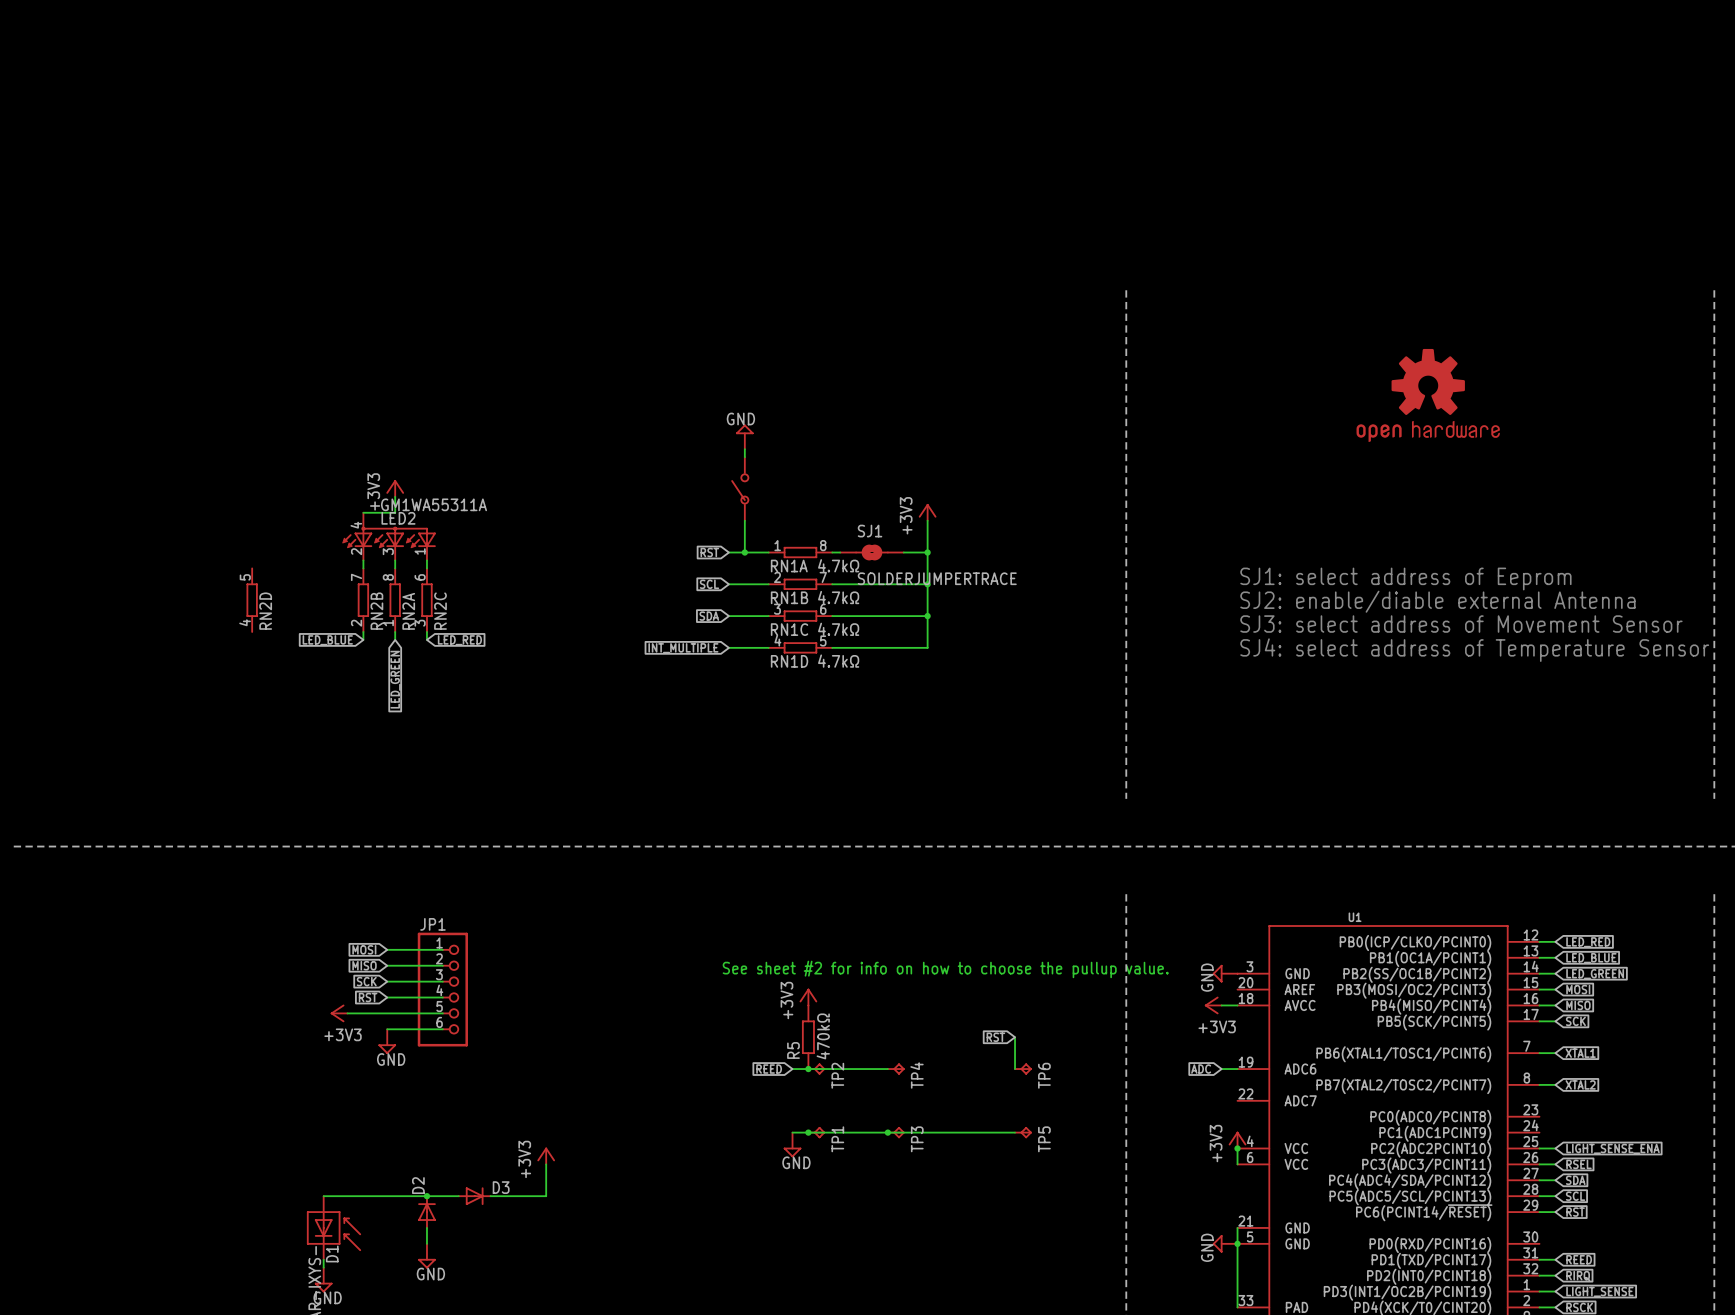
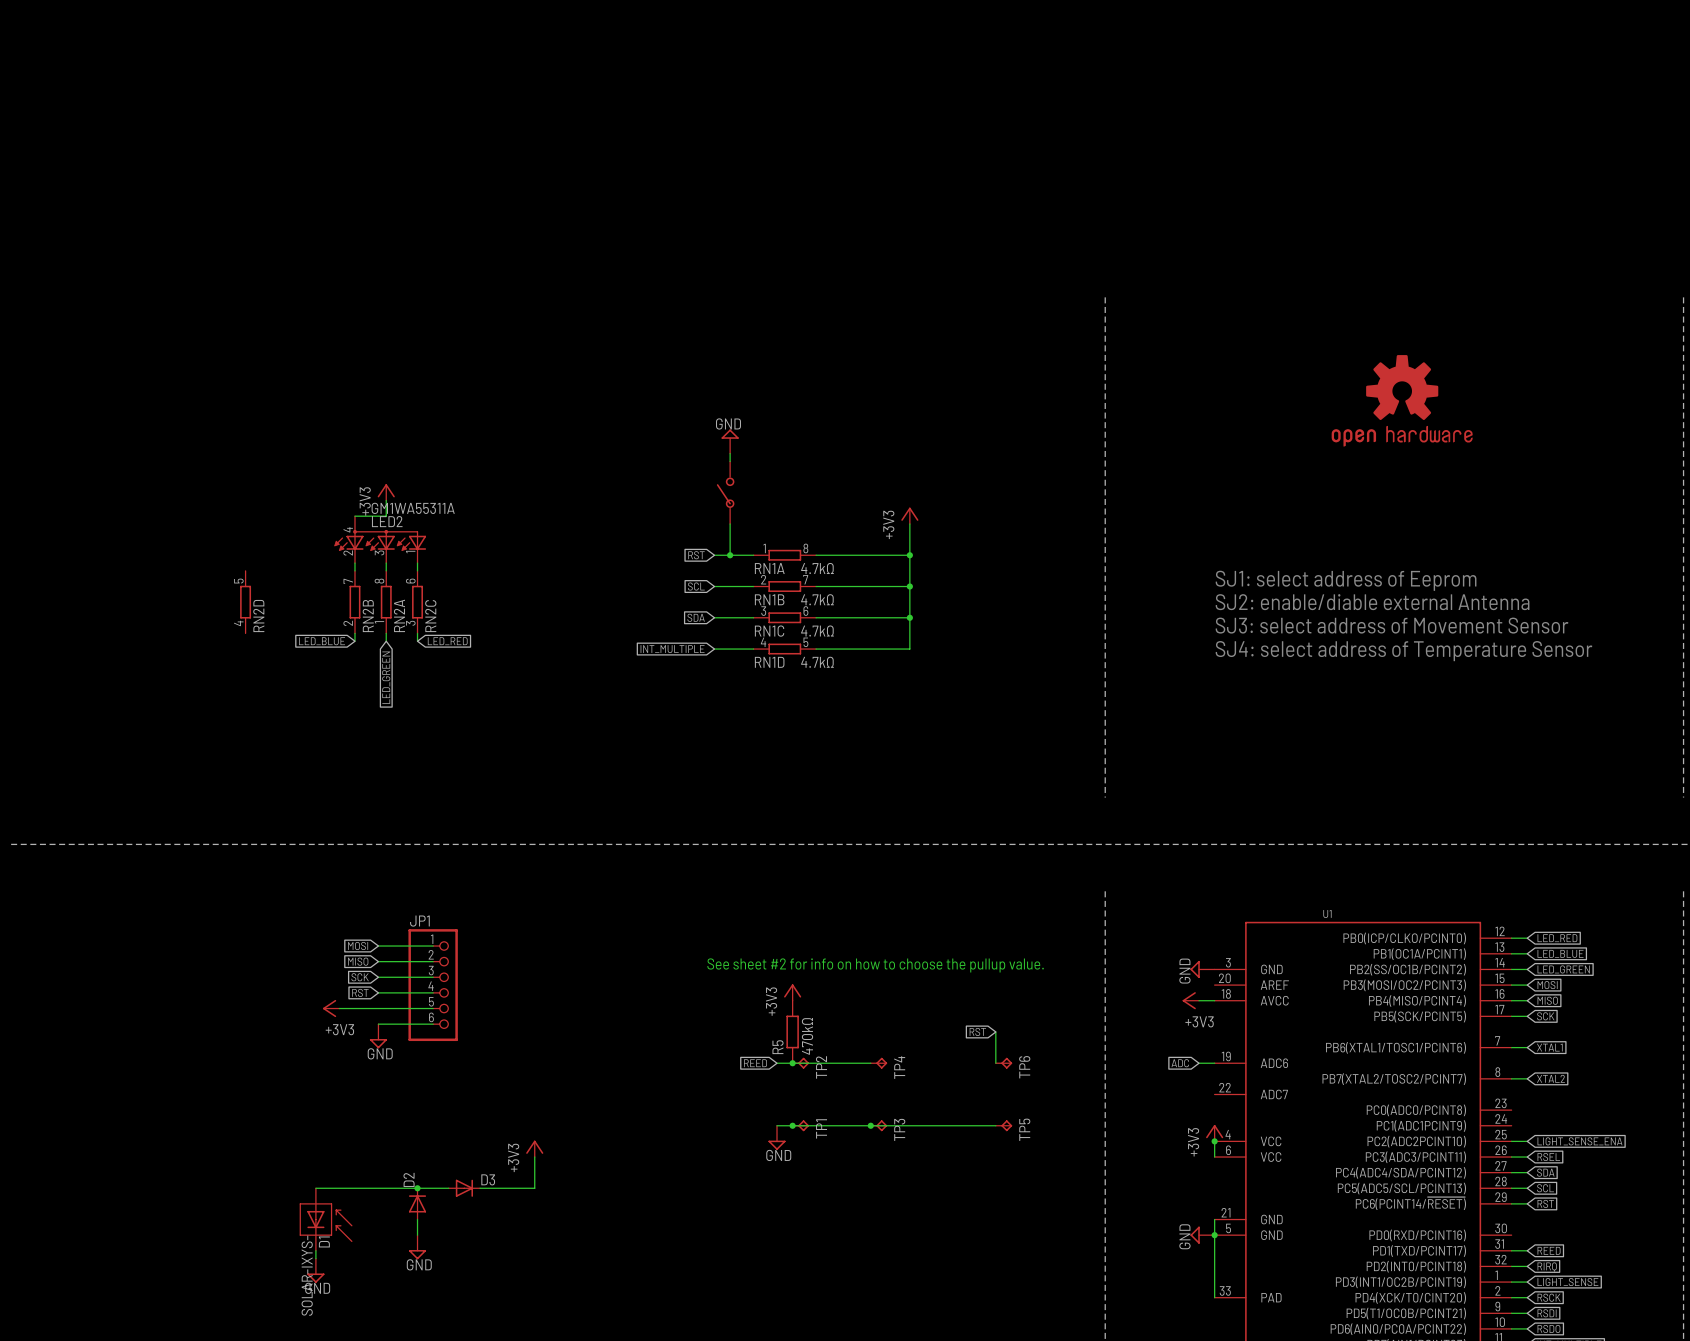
SJ1: SOLDERJUMPERTRACE (871, 552) -> none

